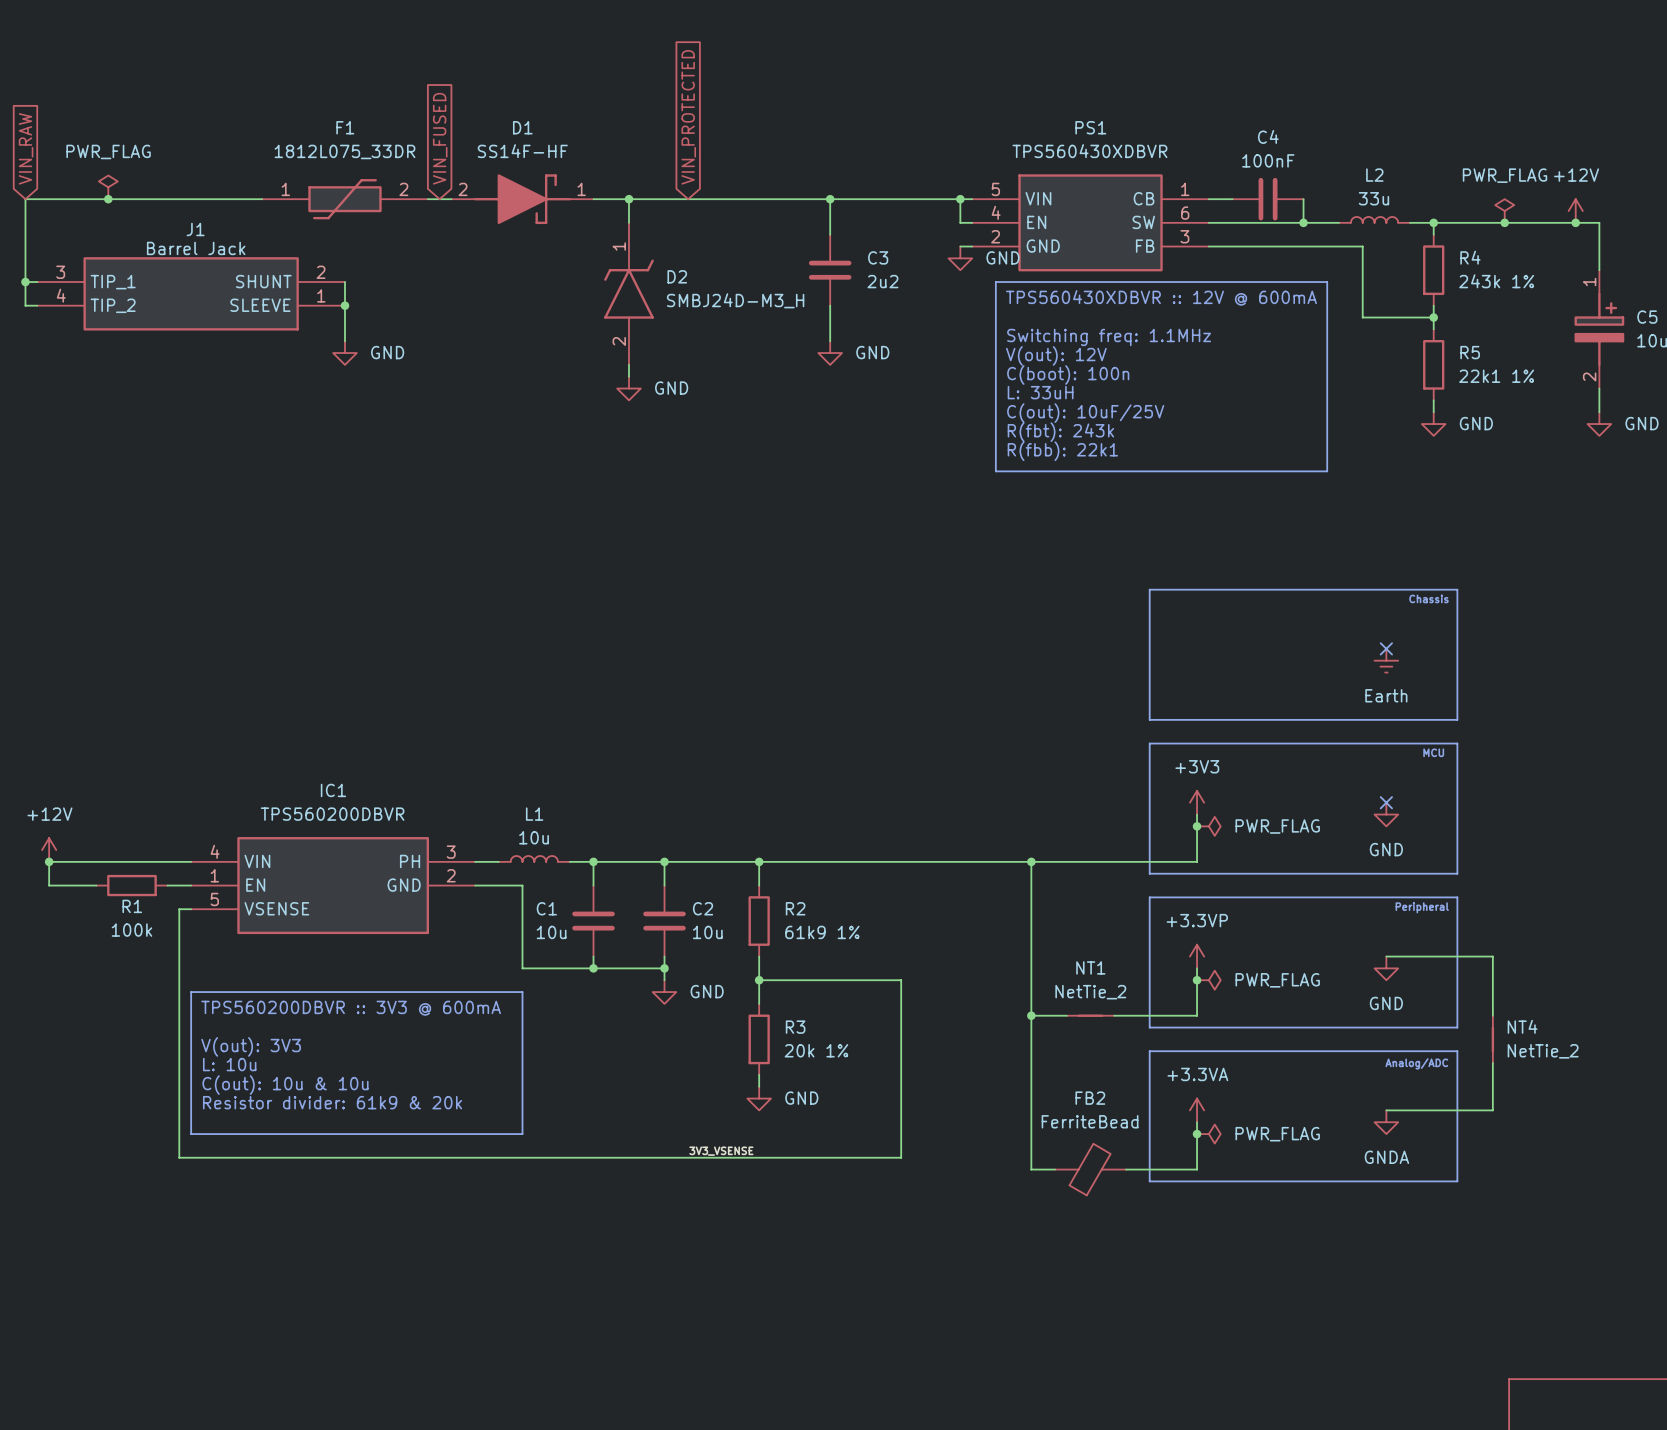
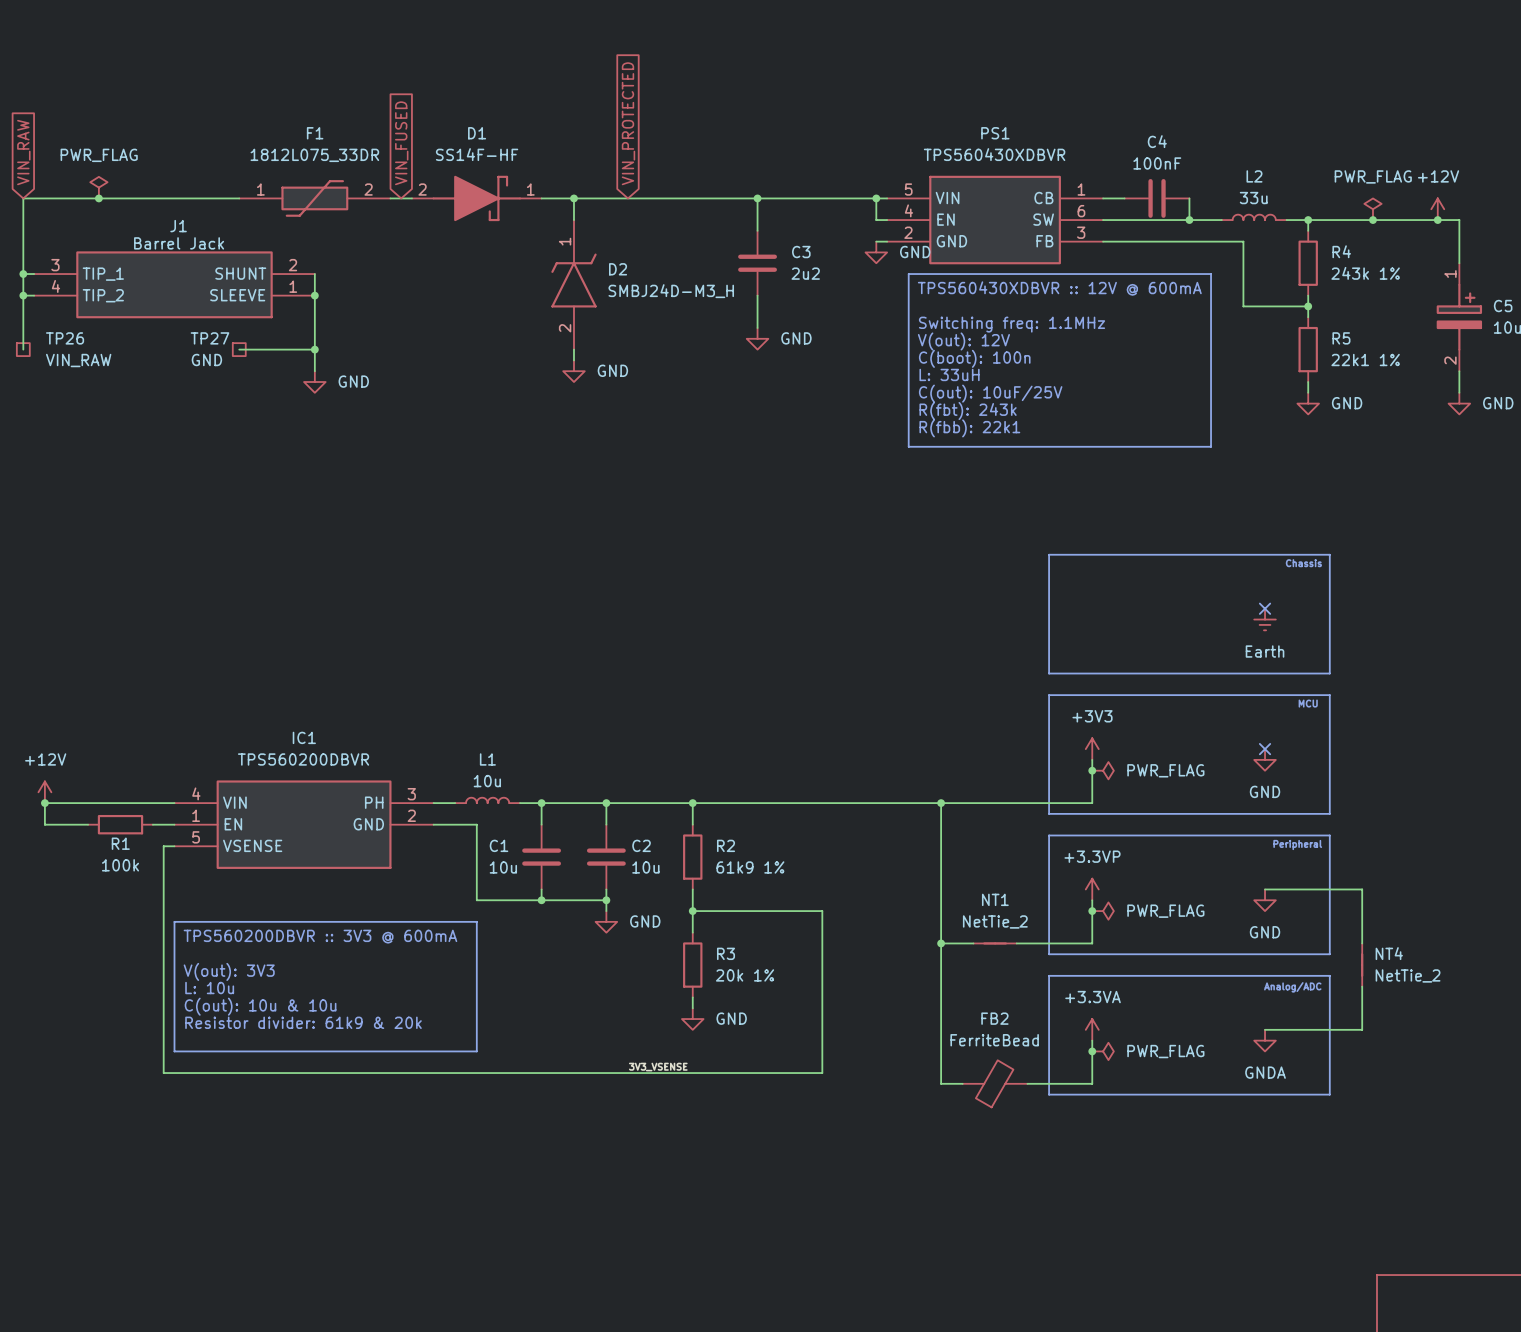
wire: none -> (23, 295) (23, 349)
junction: none -> (23, 295)
wire: none -> (314, 328) (314, 371)
power symbol position: GND (344, 353) -> GND (314, 382)
TP26: none -> VIN_RAW (23, 349)
wire: none -> (239, 349) (314, 349)
TP27: none -> GND (239, 349)
junction: none -> (314, 349)

